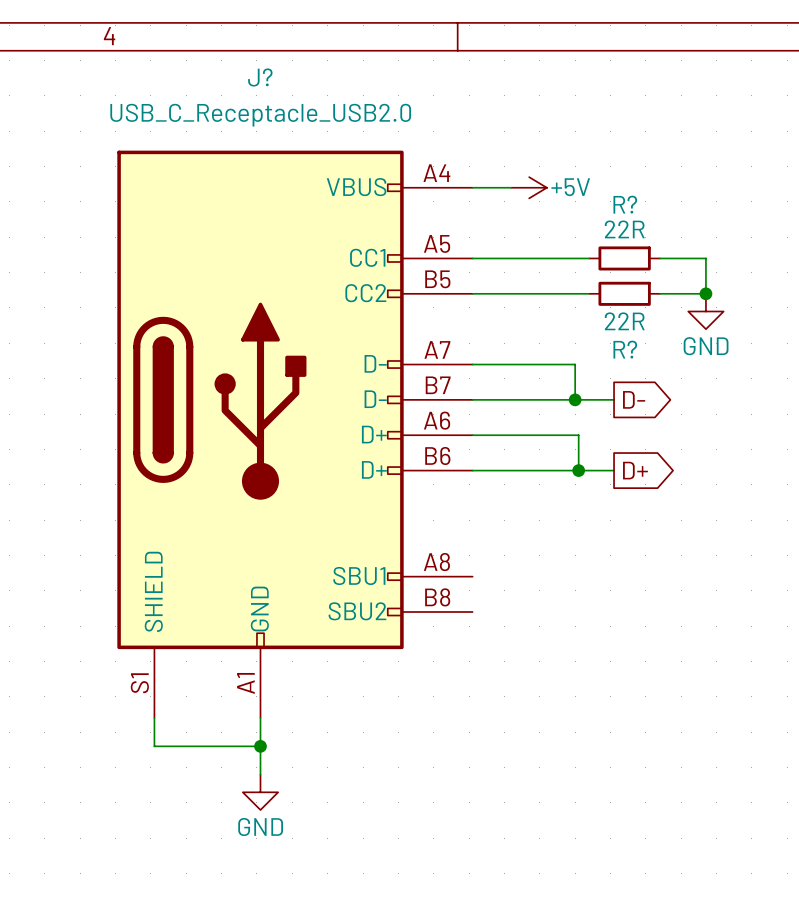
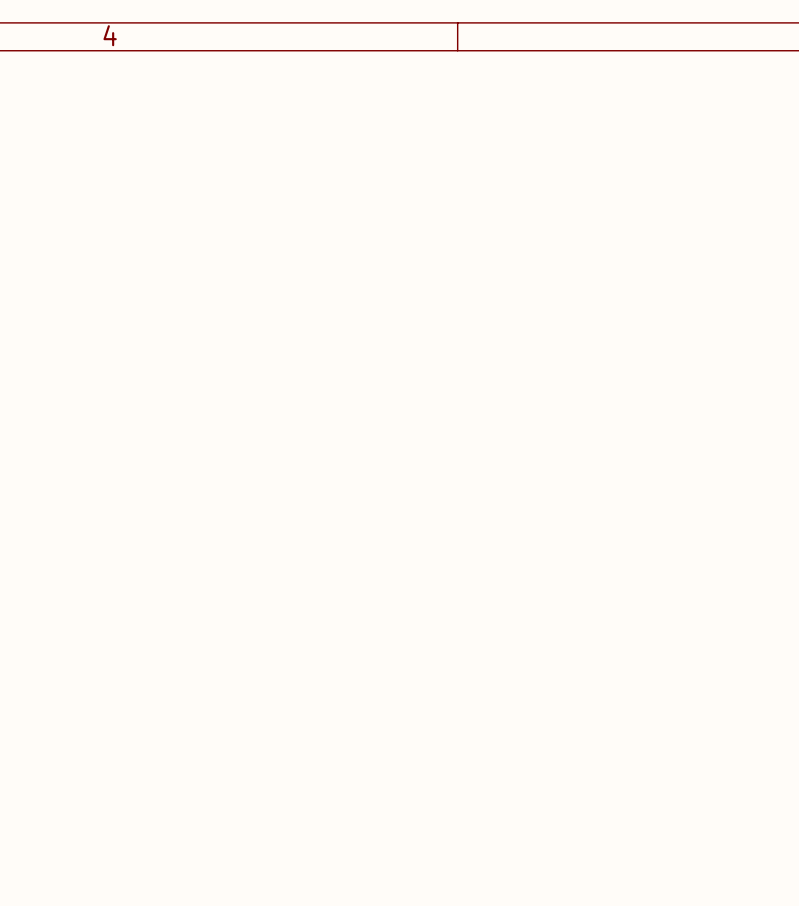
wire: (472, 187) (511, 187) -> none
power symbol: +5V (529, 187) -> none
wire: (472, 258) (589, 258) -> none
R?: 22R (624, 258) -> none
wire: (659, 258) (705, 258) (705, 293) (659, 293) -> none
wire: (472, 293) (589, 293) -> none
R?: 22R (624, 293) -> none
junction: (705, 293) -> none
power symbol: GND (705, 311) -> none
wire: (472, 364) (575, 364) (575, 399) -> none
wire: (472, 399) (614, 399) -> none
junction: (575, 399) -> none
global label: D- (634, 399) -> none
J?: USB_C_Receptacle_USB2.0 (294, 434) -> none
wire: (472, 435) (578, 435) (578, 470) -> none
wire: (472, 470) (614, 470) -> none
junction: (578, 470) -> none
global label: D+ (635, 470) -> none
wire: (154, 718) (154, 746) (260, 746) -> none
wire: (260, 718) (260, 774) -> none
junction: (260, 746) -> none
power symbol: GND (260, 792) -> none

